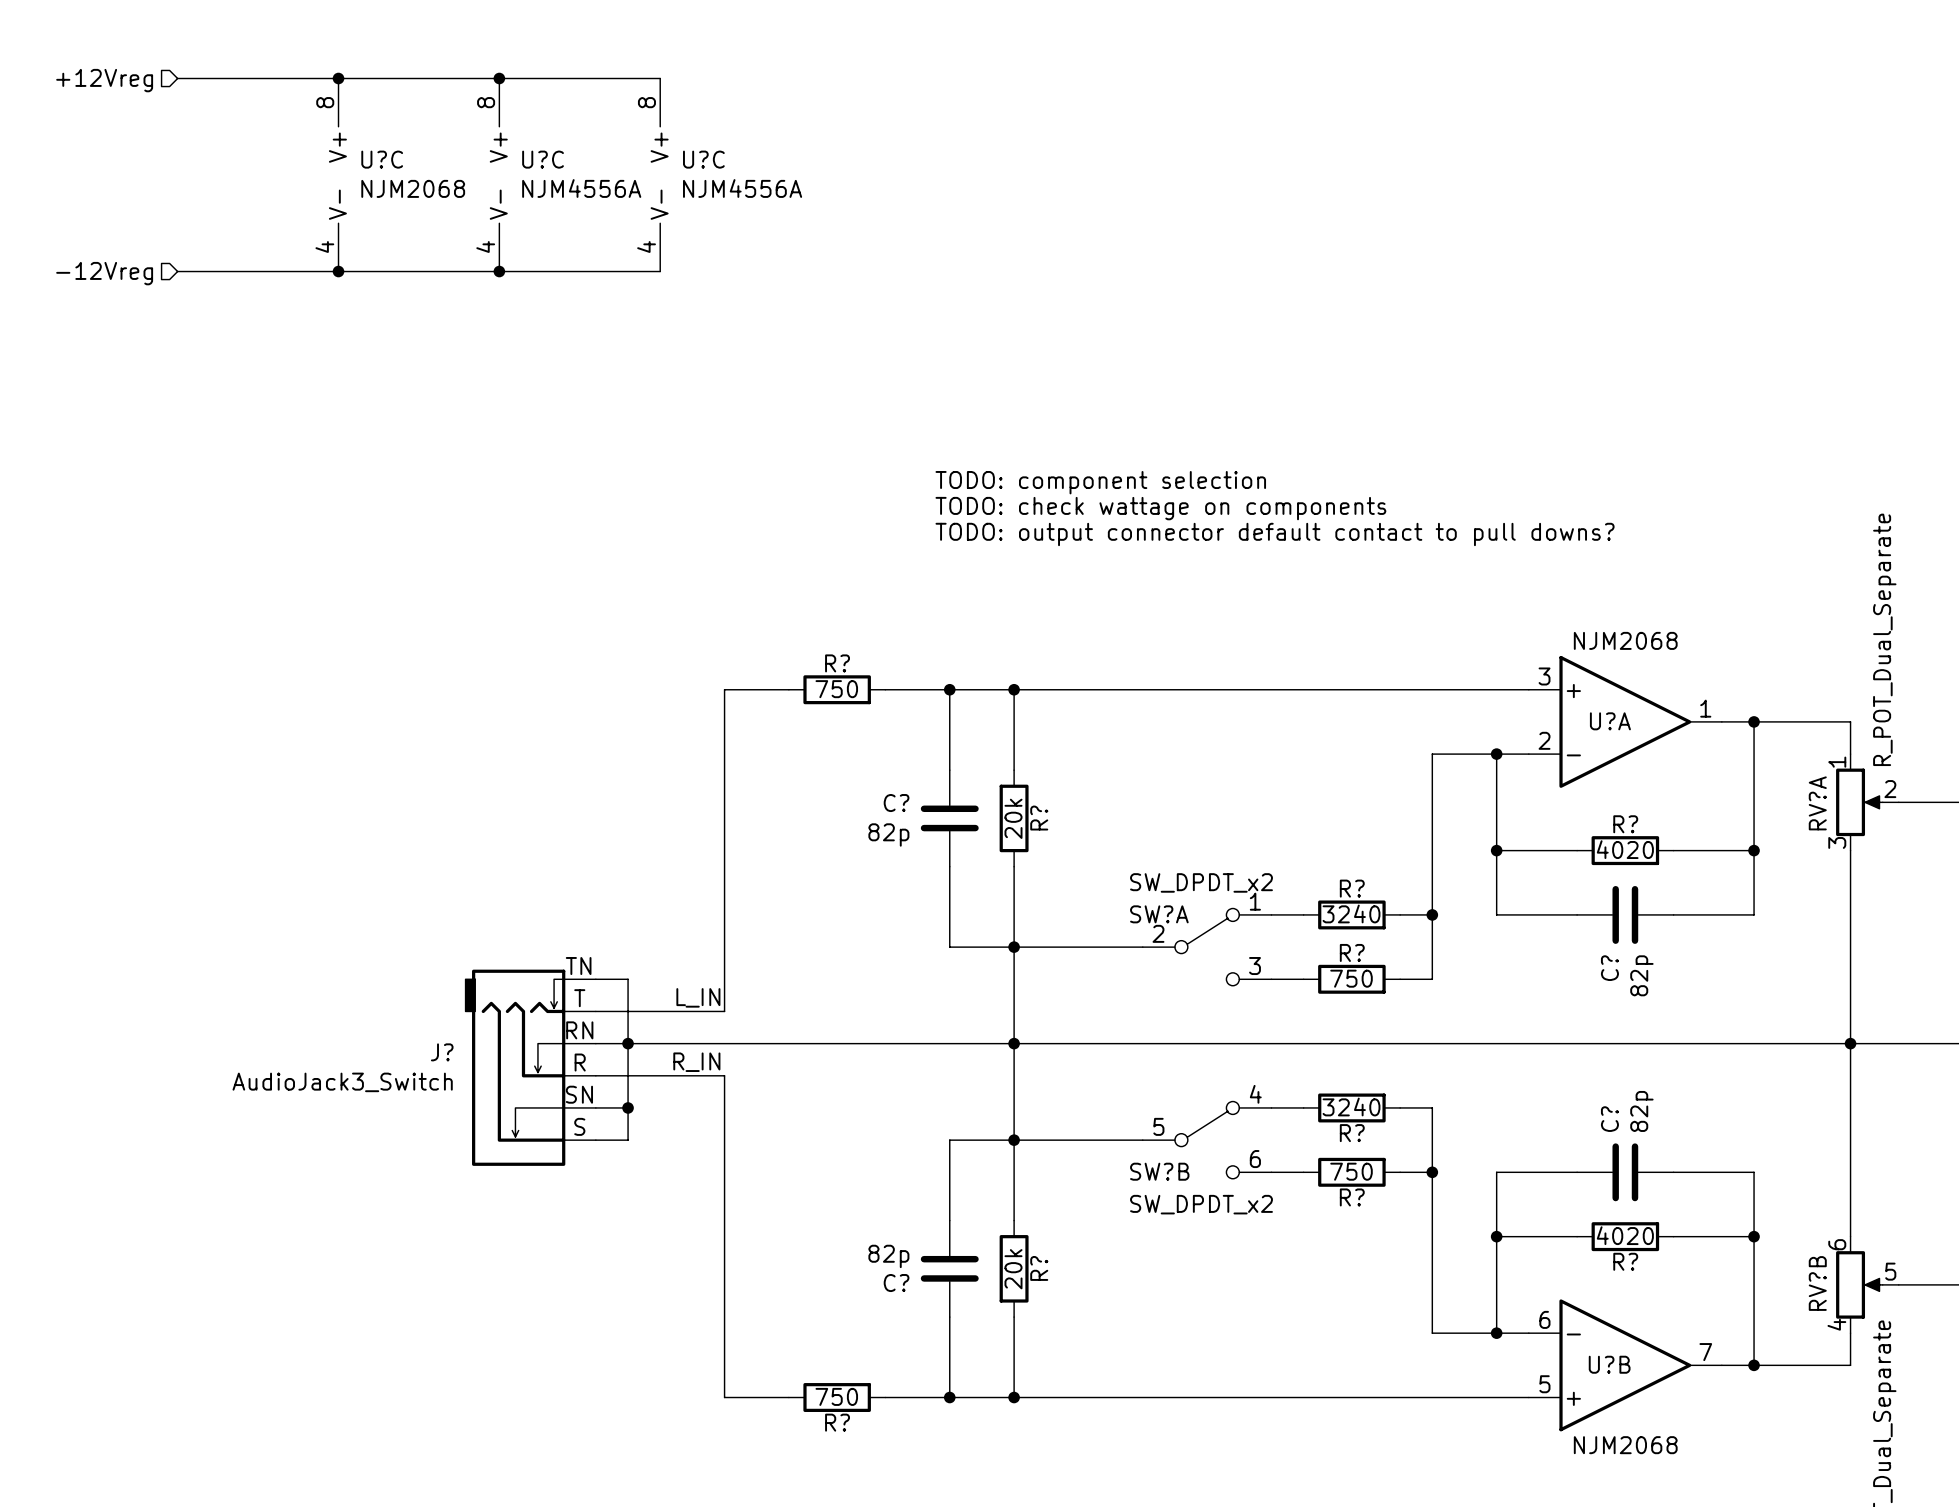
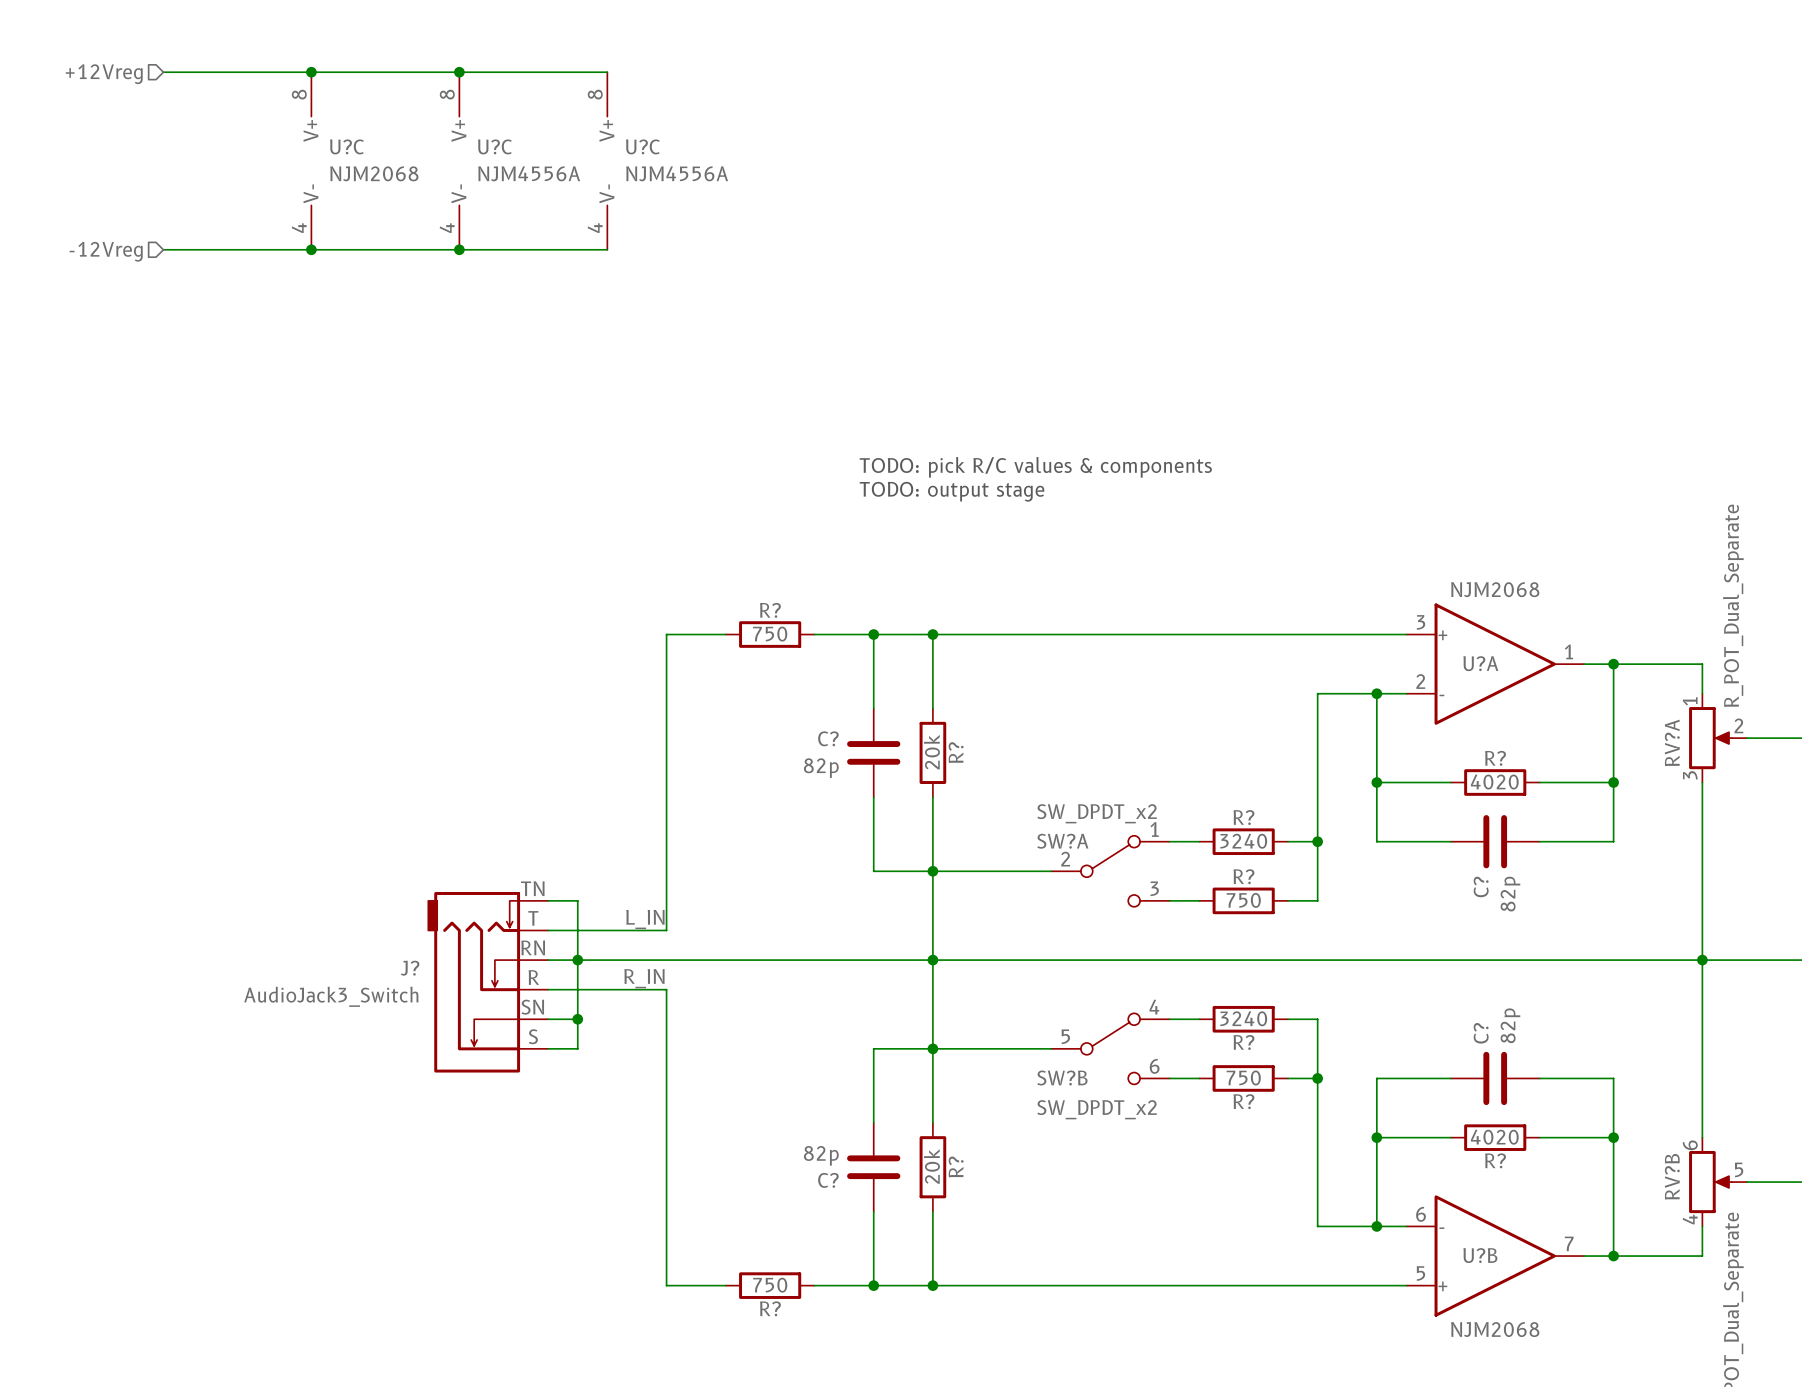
text: TODO: component selection (1100, 482) -> none
text: TODO: check wattage on components (1160, 508) -> TODO: pick R/C values & components (1035, 467)
text: TODO: output connector default contact to pull downs? (1275, 534) -> TODO: output stage (951, 491)

